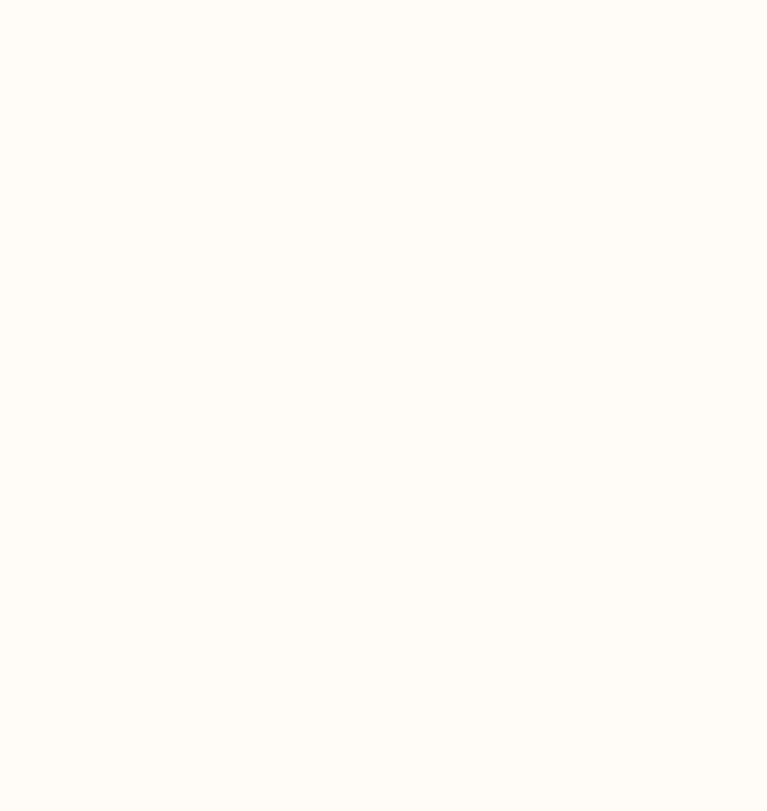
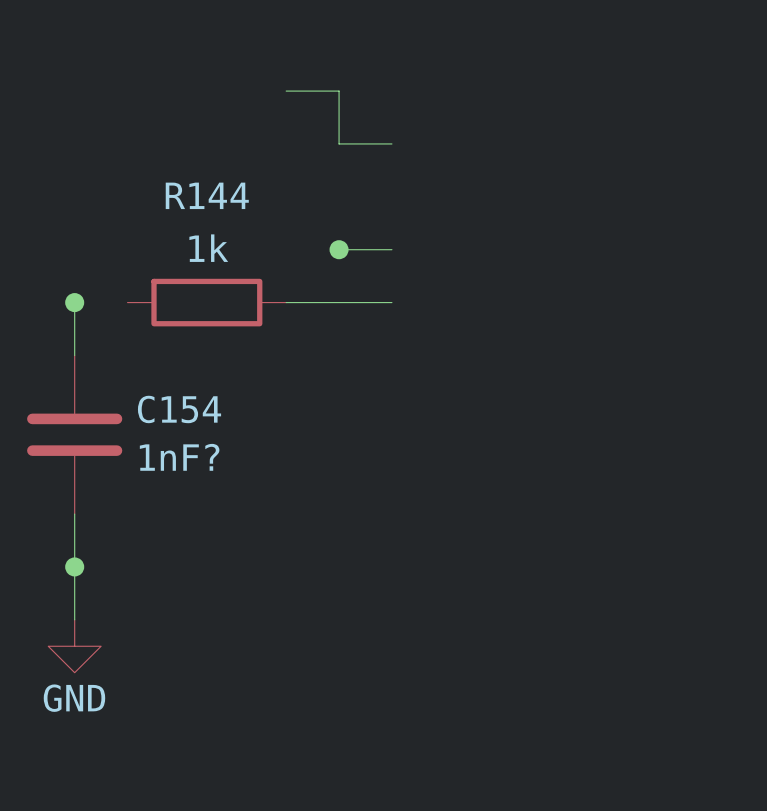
wire: none -> (286, 91) (339, 91) (339, 143) (391, 143)
wire: none -> (339, 249) (391, 249)
junction: none -> (339, 249)
wire: none -> (74, 302) (74, 355)
junction: none -> (74, 302)
R144: none -> 1k (206, 302)
wire: none -> (286, 302) (391, 302)
C154: none -> 1nF? (74, 434)
wire: none -> (74, 514) (74, 619)
junction: none -> (74, 566)
power symbol: none -> GND (74, 646)

